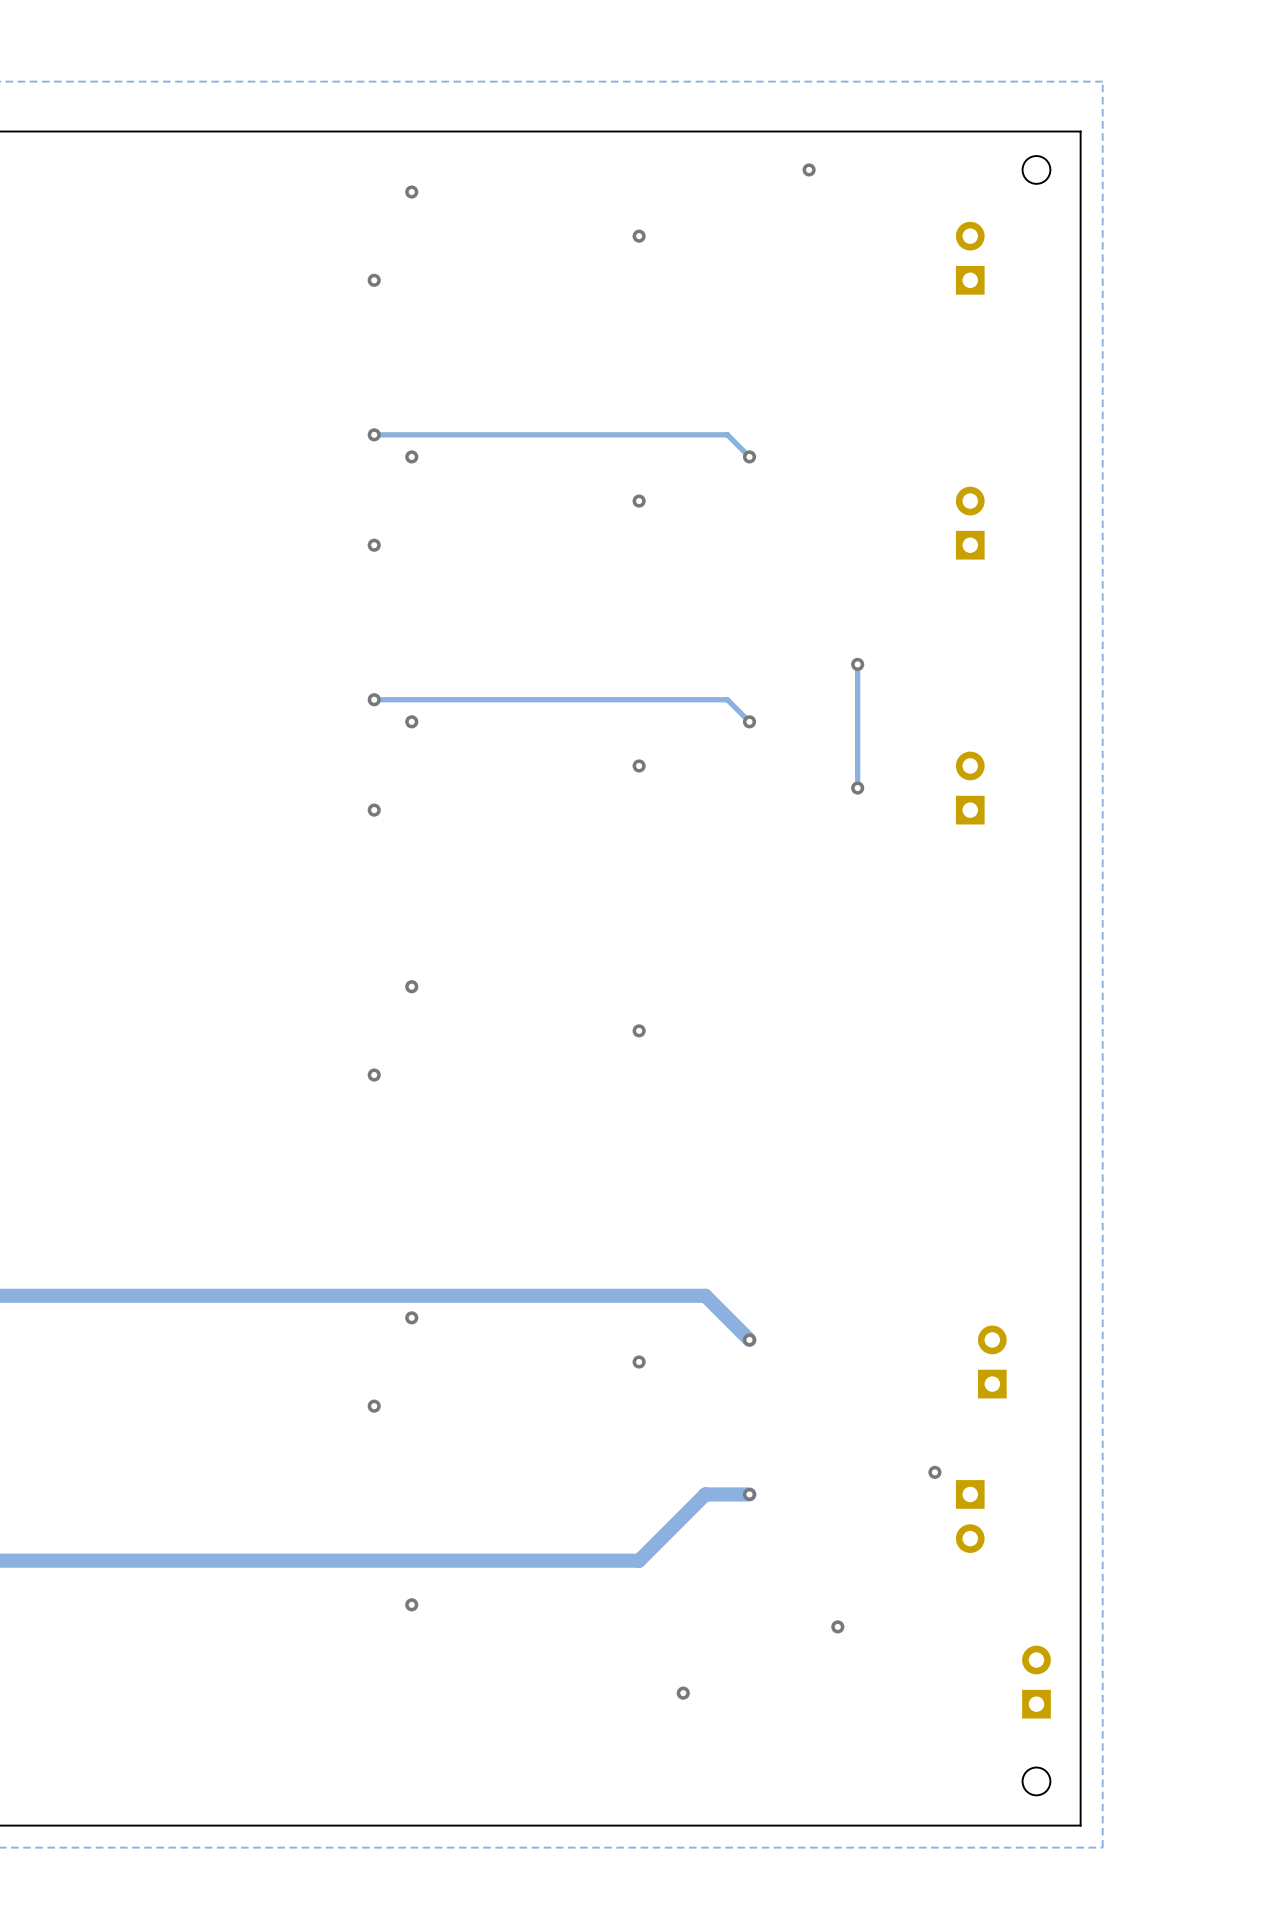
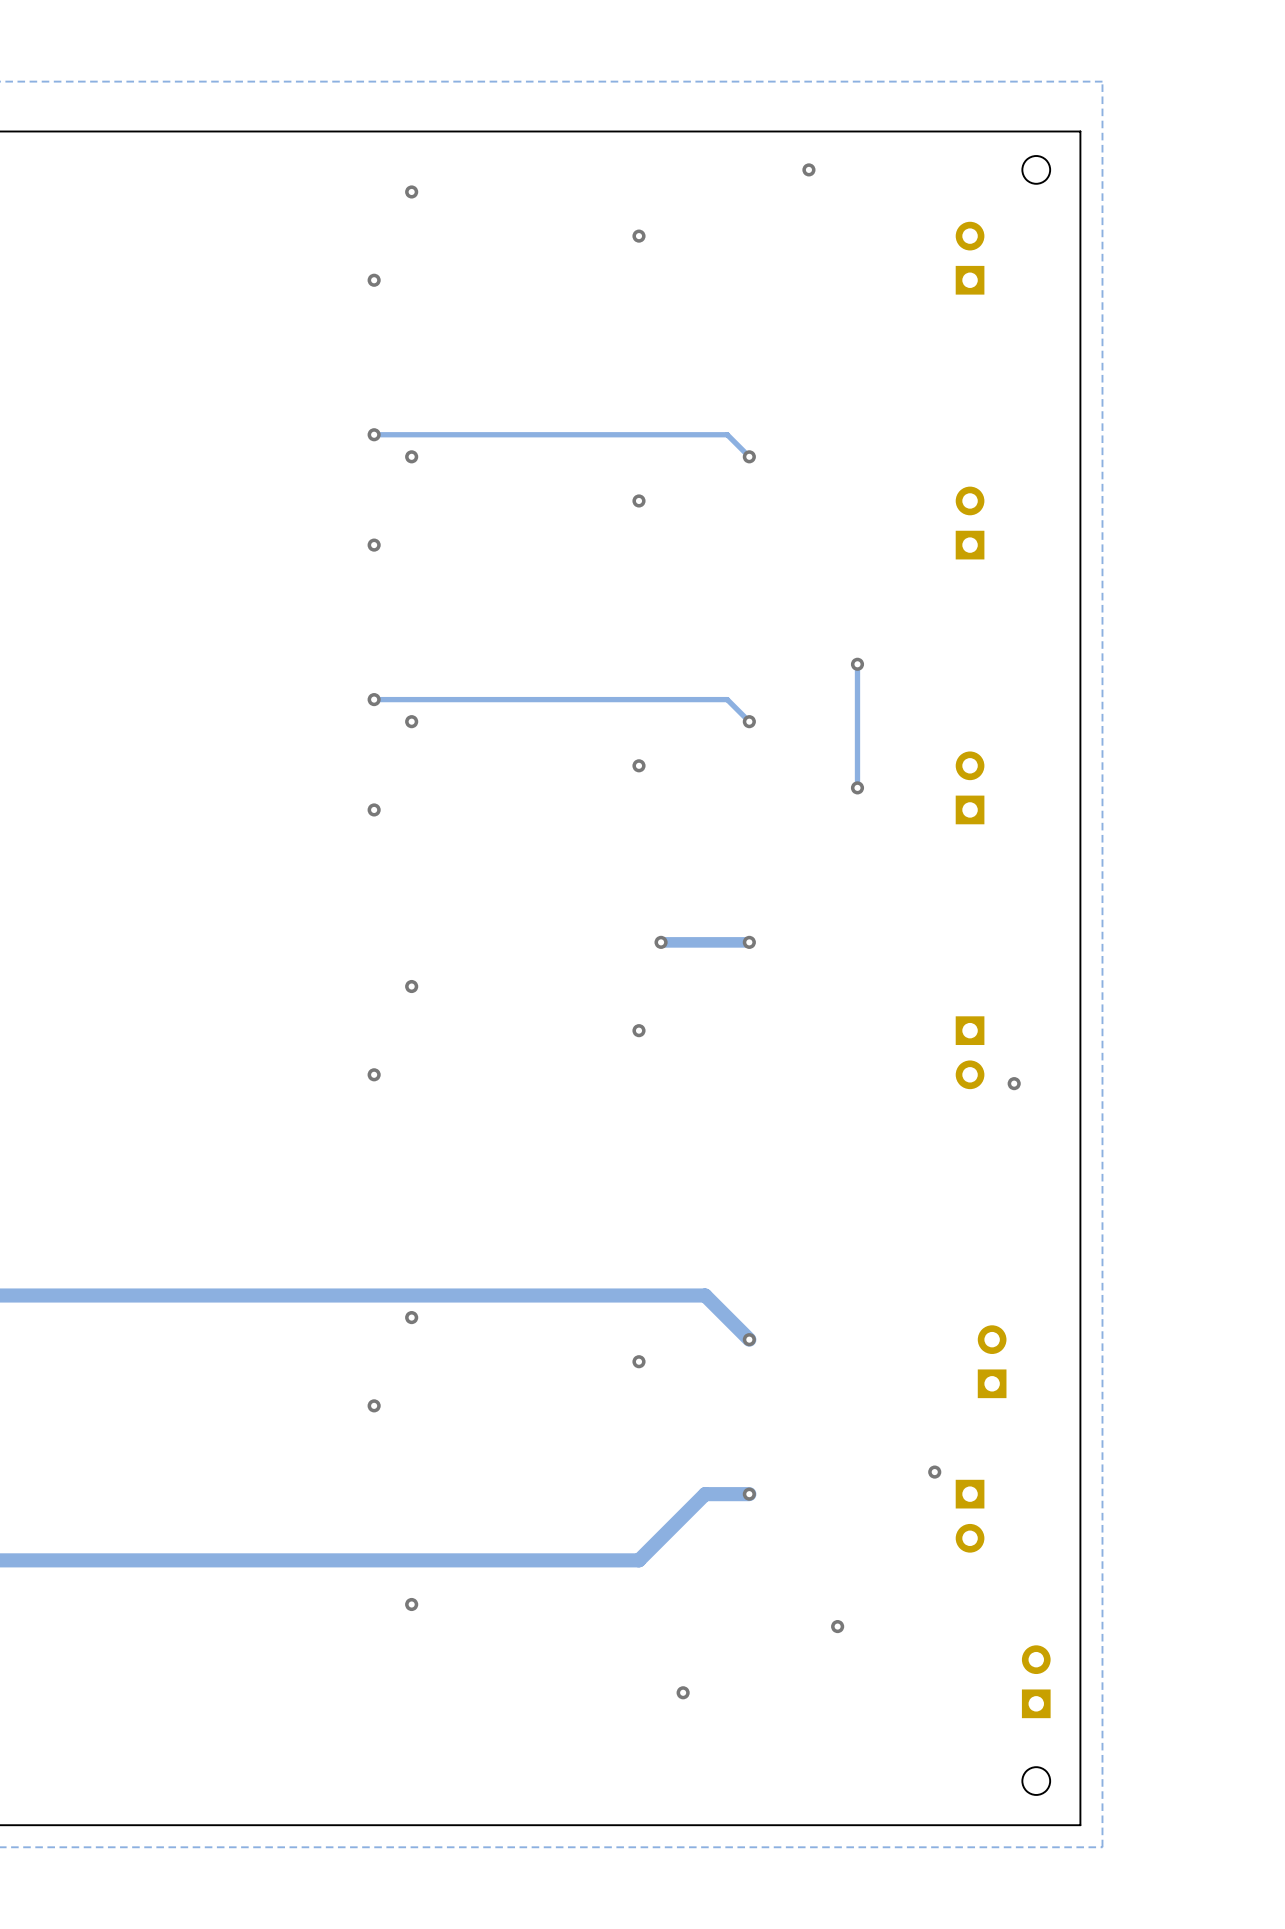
via: none -> (661, 942)
track: none -> (749, 942) (661, 942)
via: none -> (749, 942)
part: none -> (970, 1052)
via: none -> (1014, 1083)

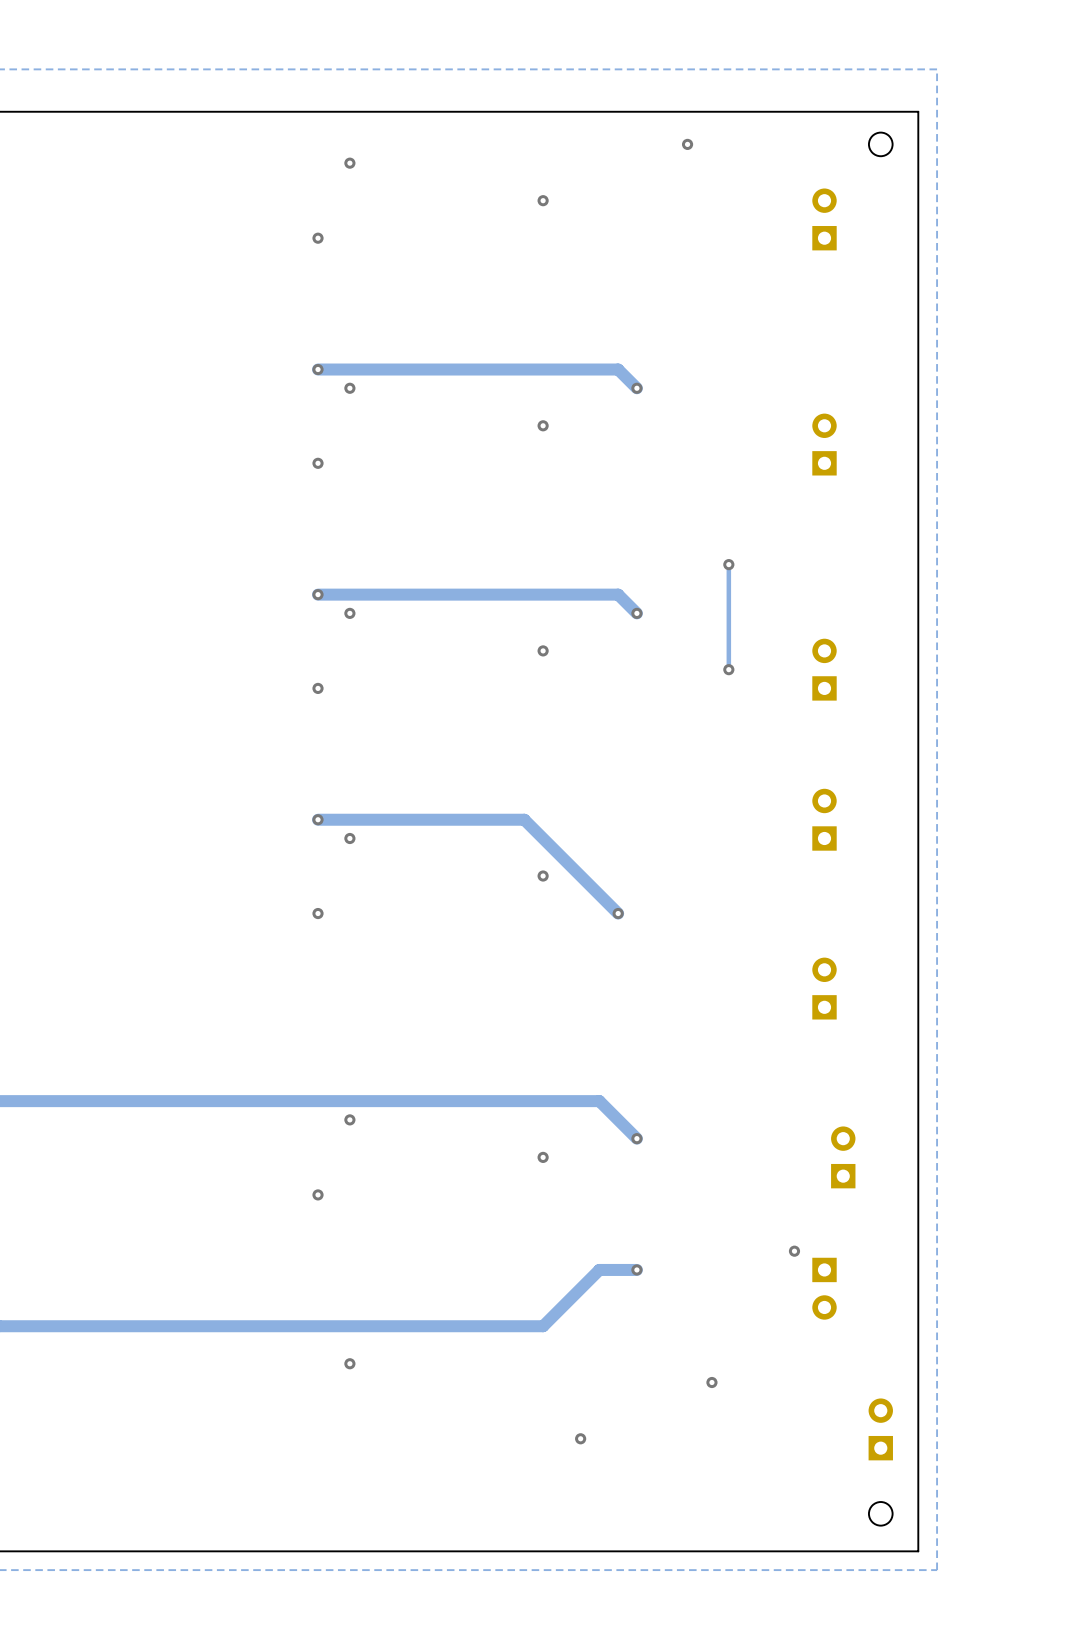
track width: thin (374, 434) (727, 434) (749, 456) -> thick (318, 369) (618, 369) (636, 388)
track width: thin (374, 699) (727, 699) (749, 721) -> thick (318, 594) (618, 594) (636, 613)
via: (661, 942) -> none
track: (749, 942) (661, 942) -> none
via: (749, 942) -> none
track: none -> (318, 819) (524, 819) (618, 913)
via: none -> (318, 819)
part: none -> (824, 819)
part: (970, 1052) -> none
via: none -> (618, 913)
via: (1014, 1083) -> none
part: none -> (824, 988)

